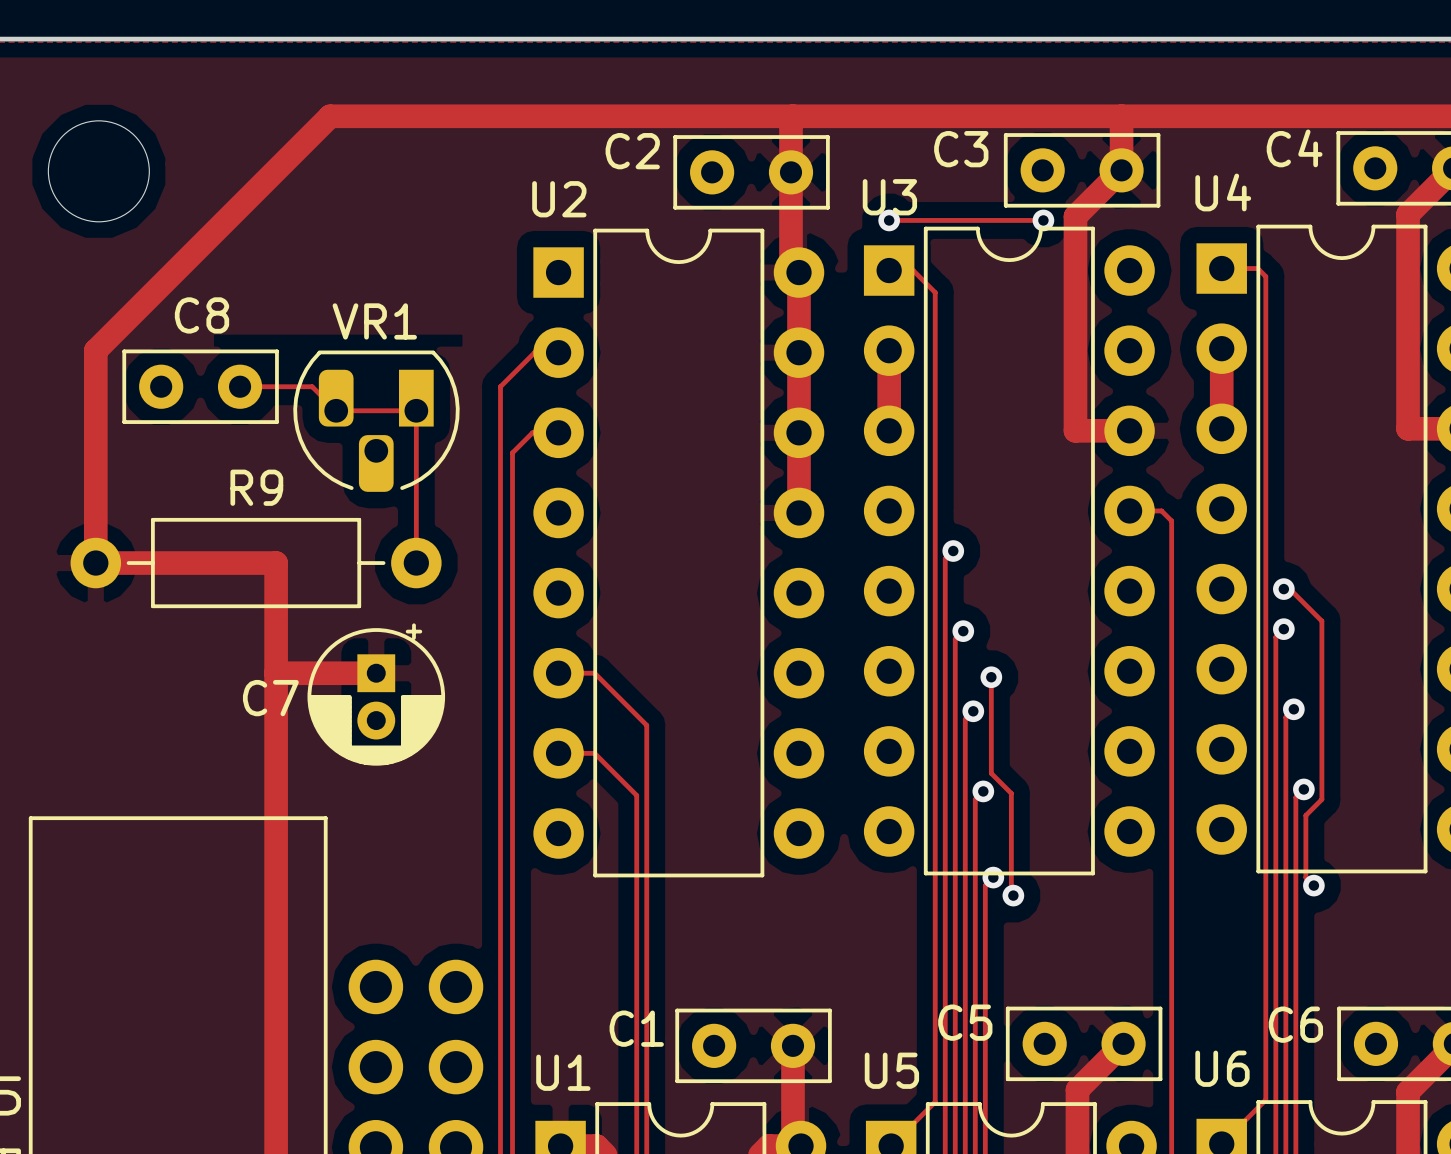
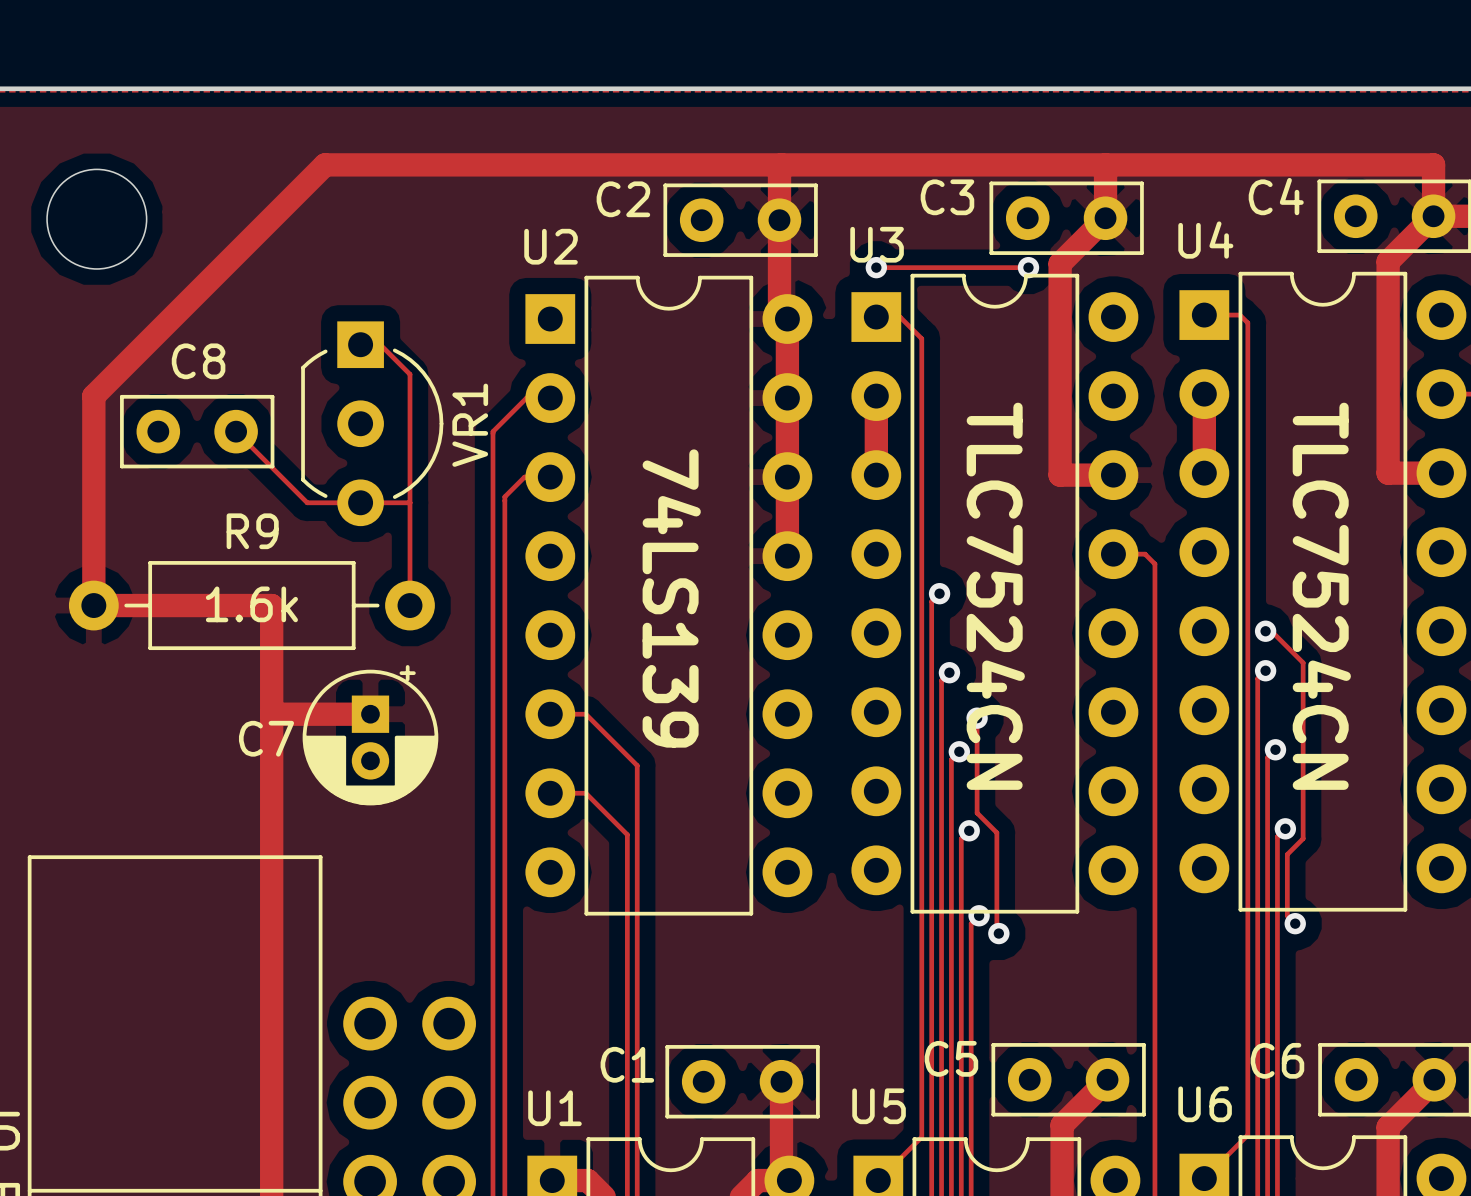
track: none -> (360, 344) (380, 344) (410, 374) (410, 455)
VR1 name position: VR1 (374, 321) -> VR1 (470, 425)
VR1 footprint: [293, 350, 460, 492] -> [301, 321, 444, 527]
track: (240, 386) (312, 386) (336, 410) (416, 410) -> (236, 431) (307, 502) (410, 502)
text: none -> TLC7524CN (995, 596)
text: none -> TLC7524CN (1321, 596)
text: none -> 74LS139 (671, 598)
R9 value: none -> 1.6k (251, 604)

